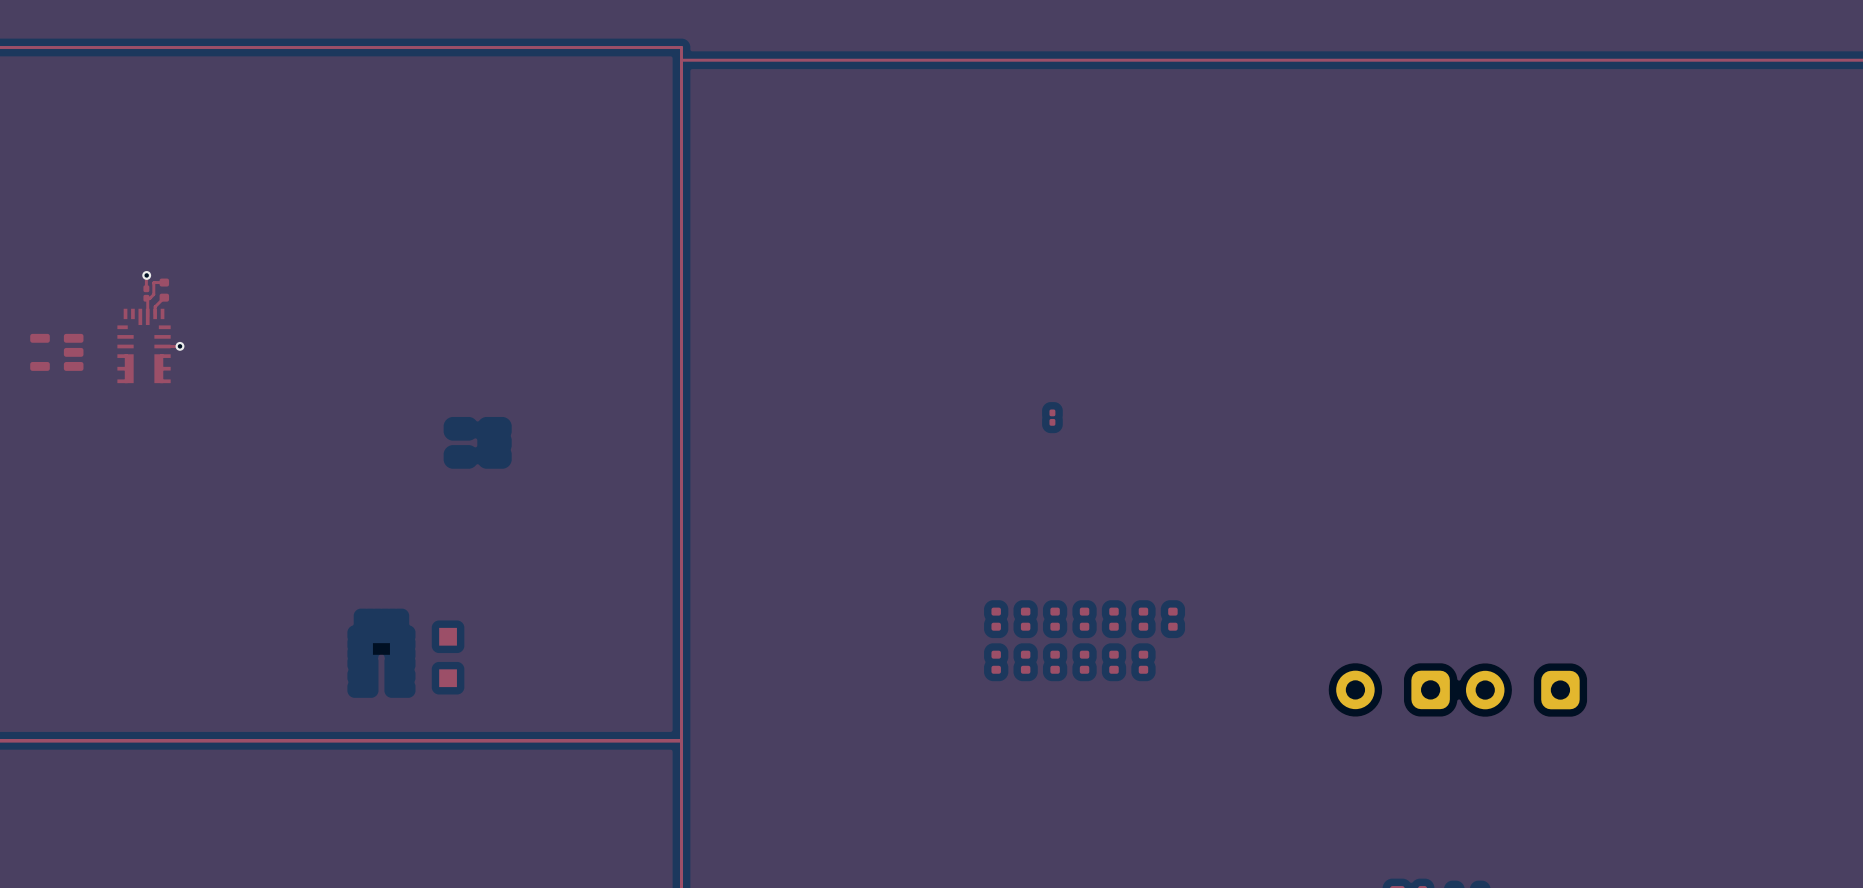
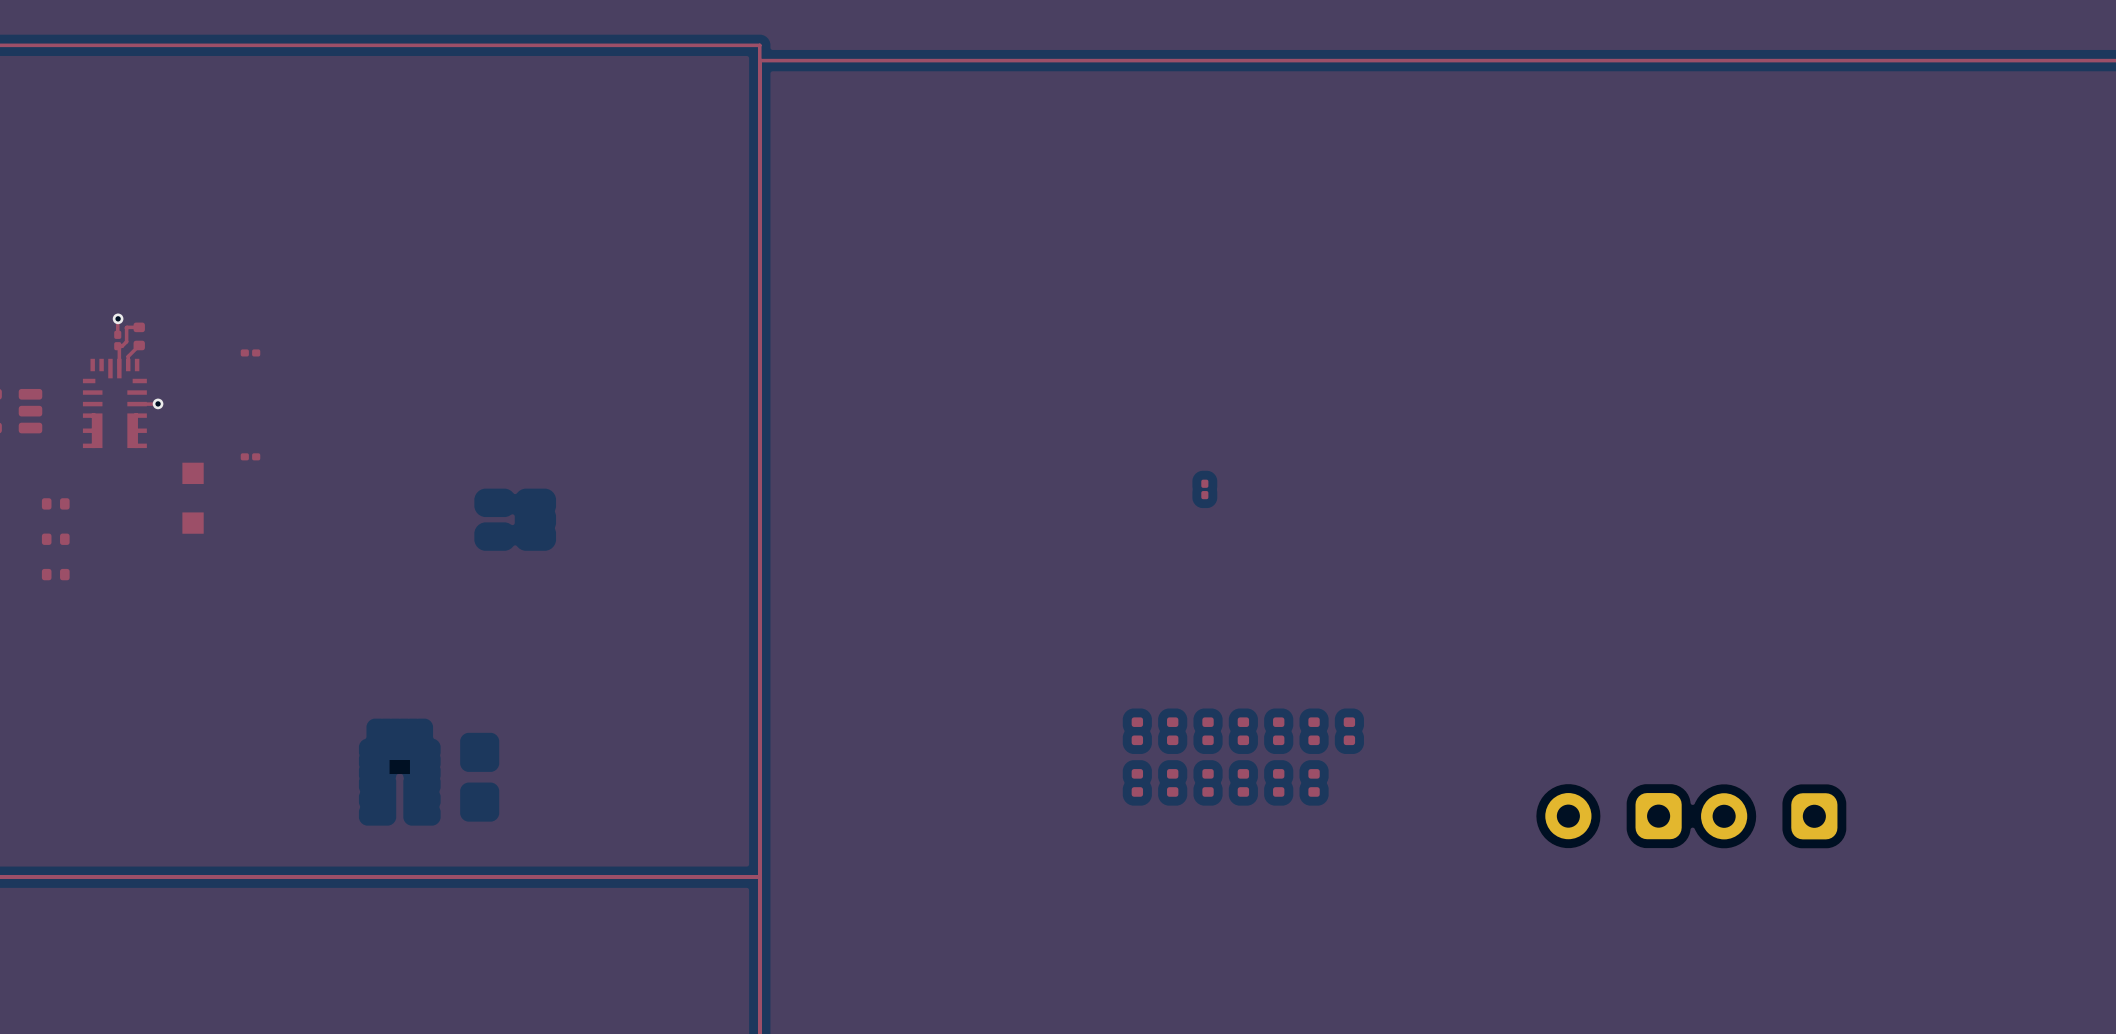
part: none -> (250, 352)
part: none -> (250, 456)
part: none -> (55, 503)
part: none -> (55, 539)
part: none -> (55, 574)
part position: (448, 657) -> (193, 498)

